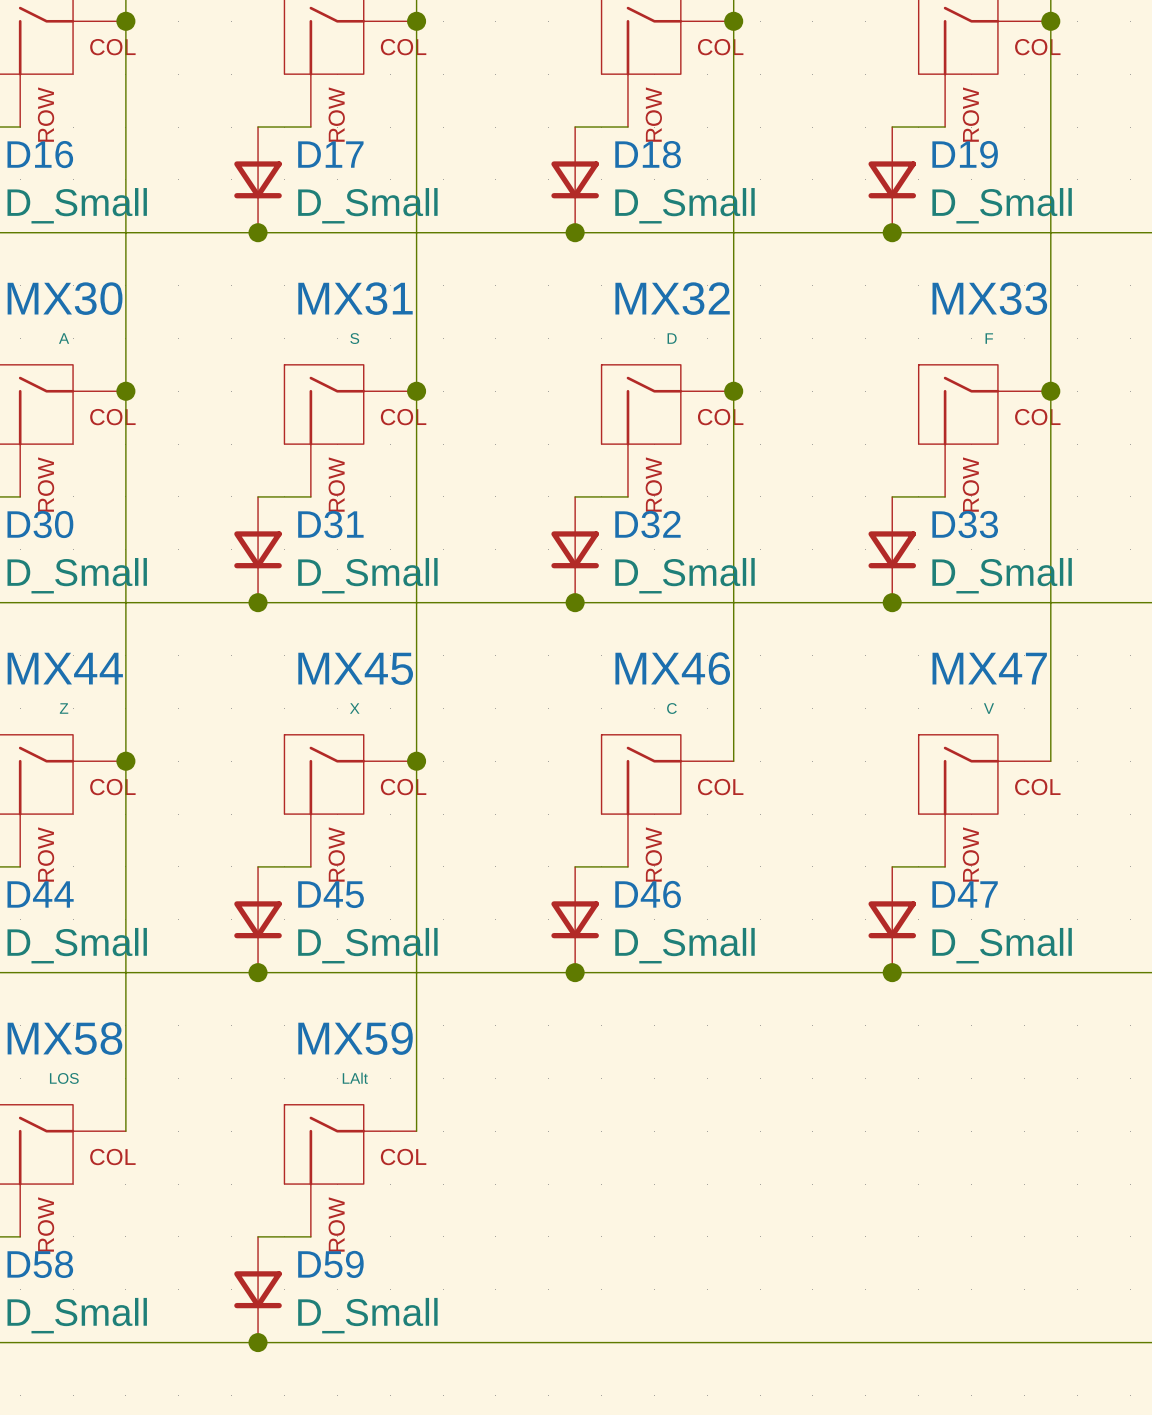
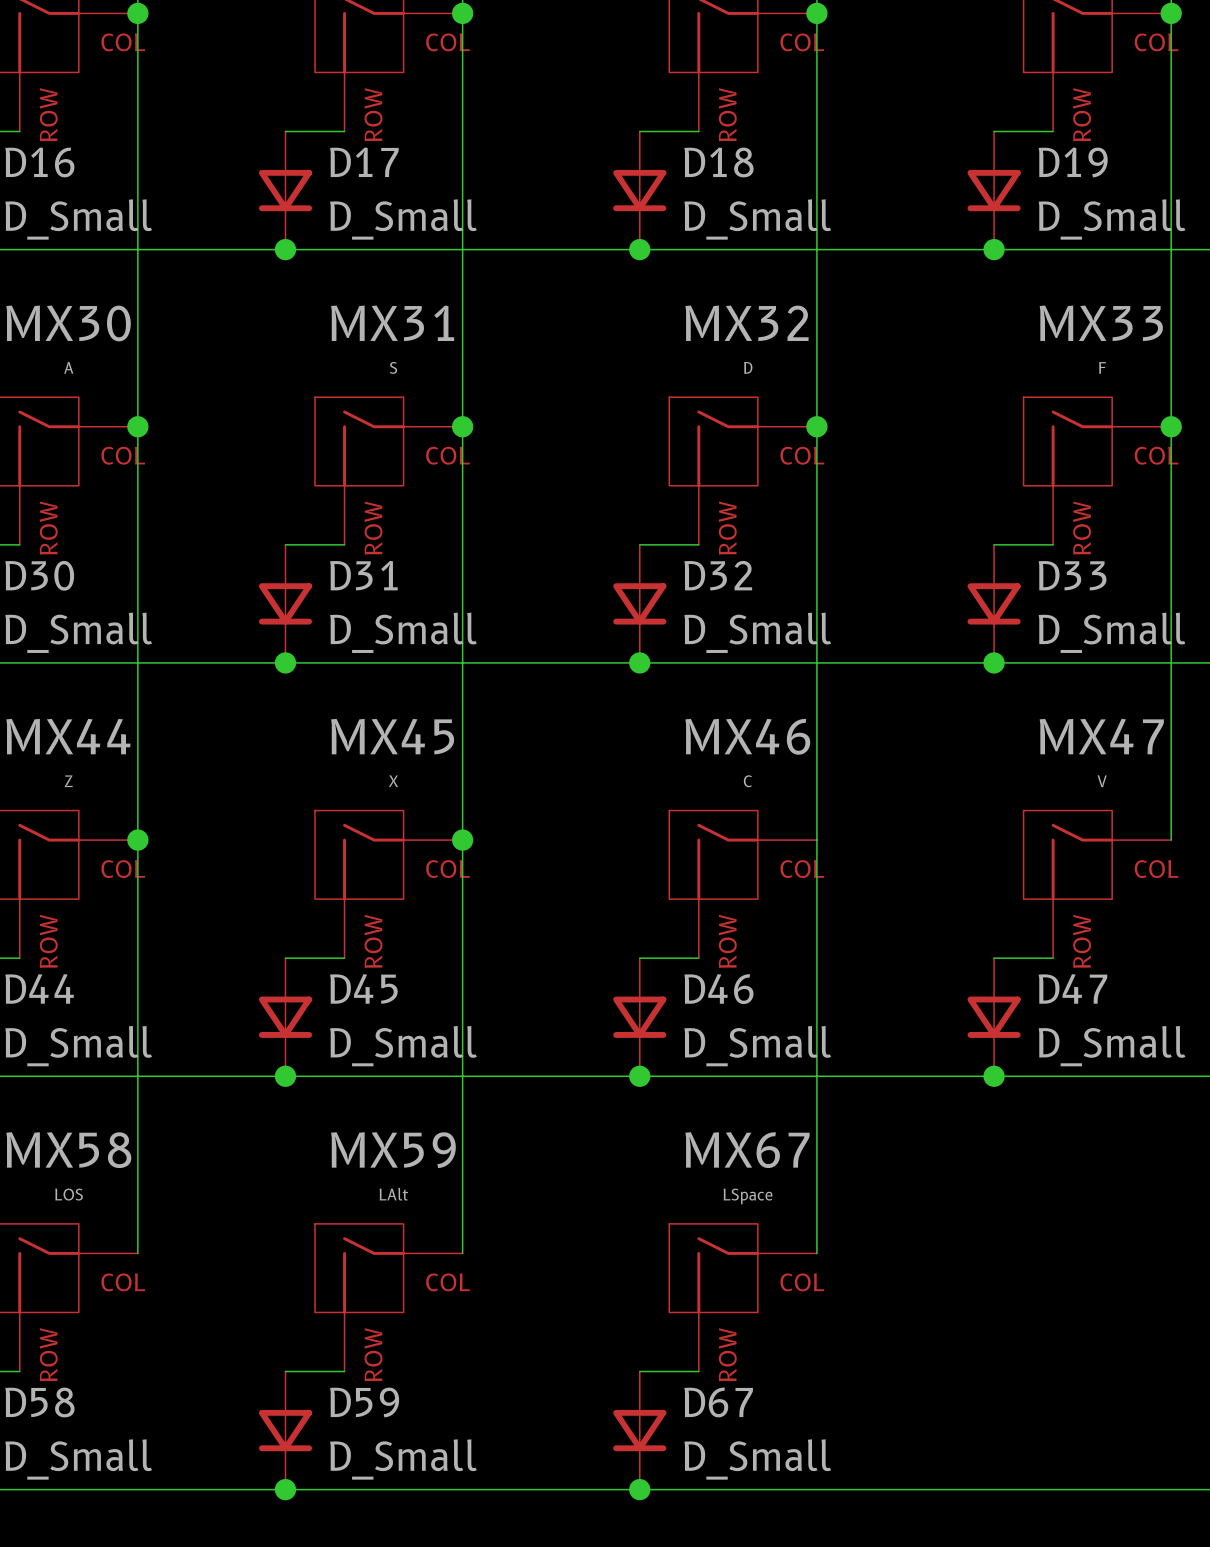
wire: none -> (816, 840) (816, 1253)
MX67: none -> LSpace (743, 1297)
wire: none -> (639, 1371) (698, 1371)
D67: none -> D_Small (639, 1430)
junction: none -> (639, 1489)

